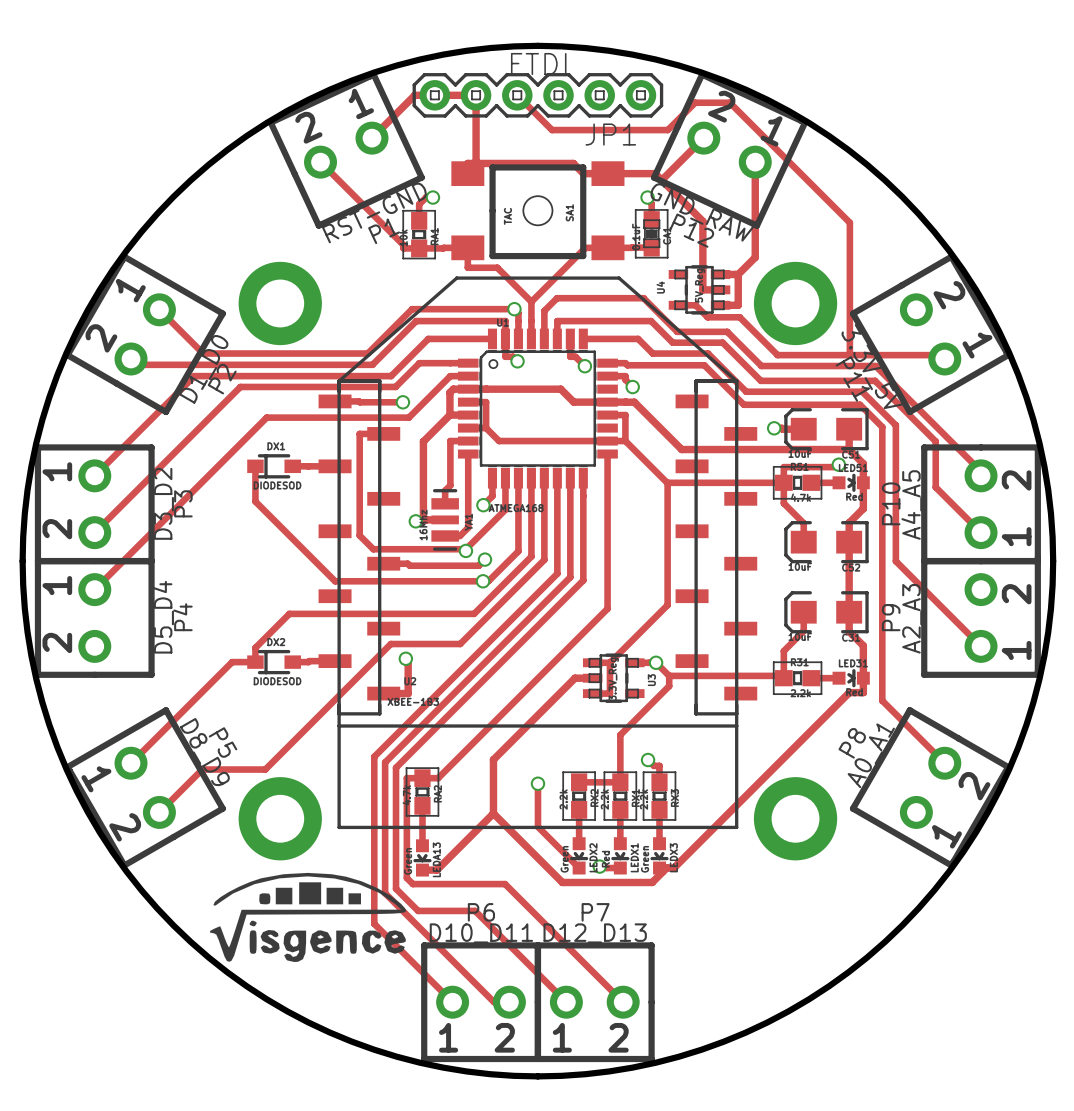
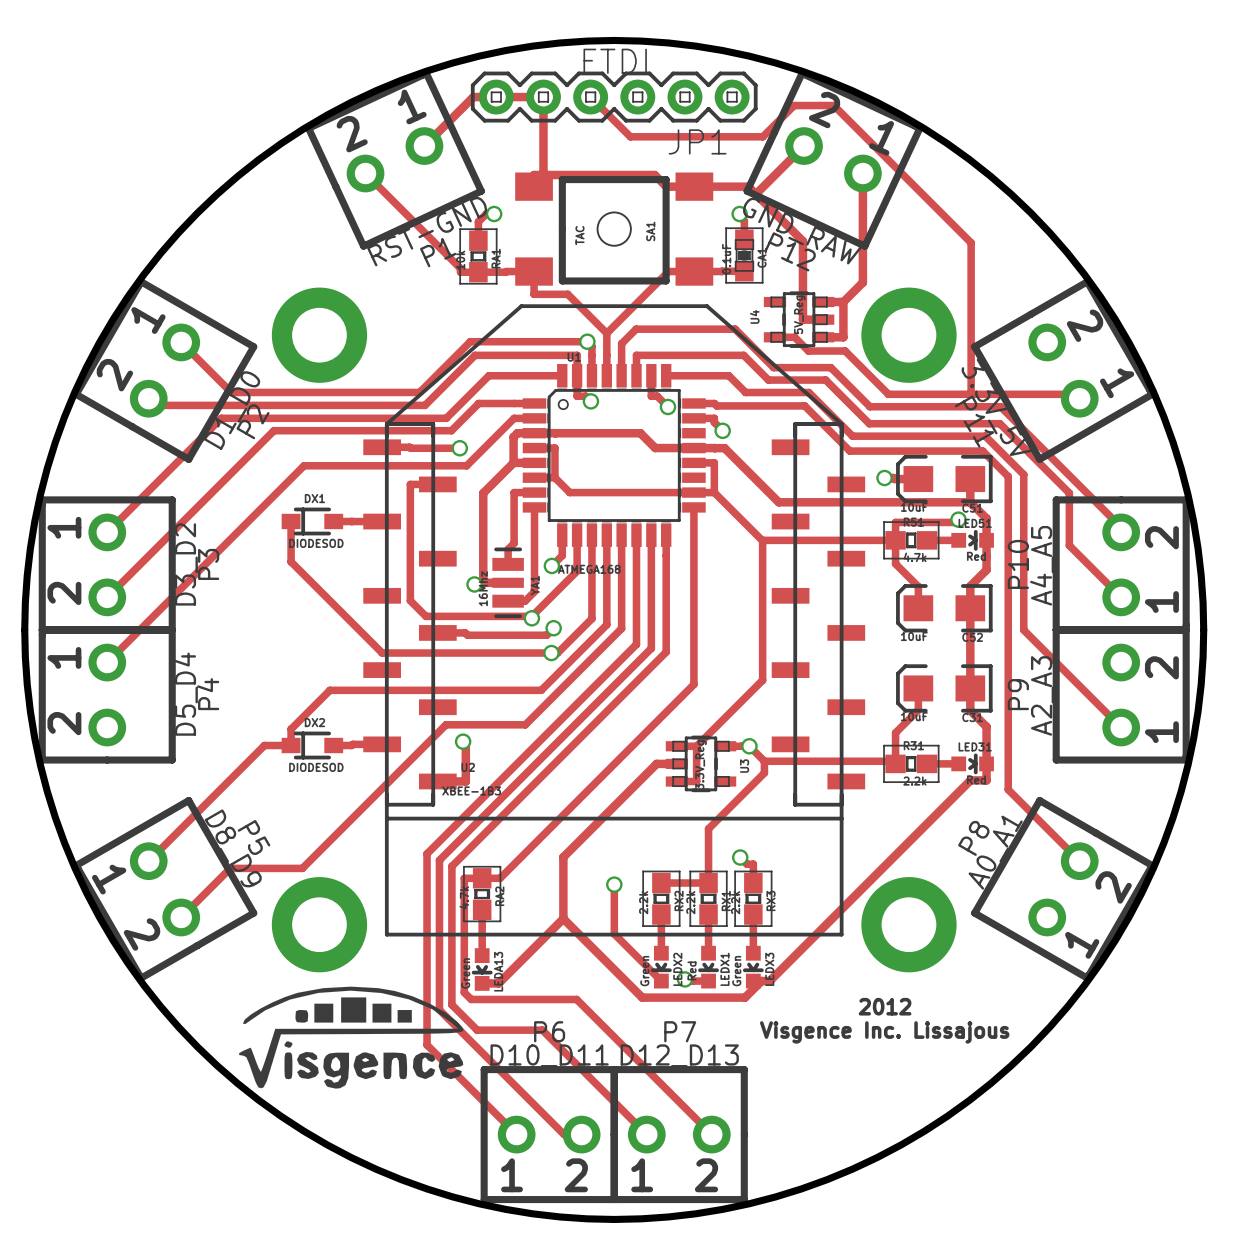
text: none -> 2012 (885, 1006)
text: none -> Visgence Inc. Lissajous (884, 1032)

